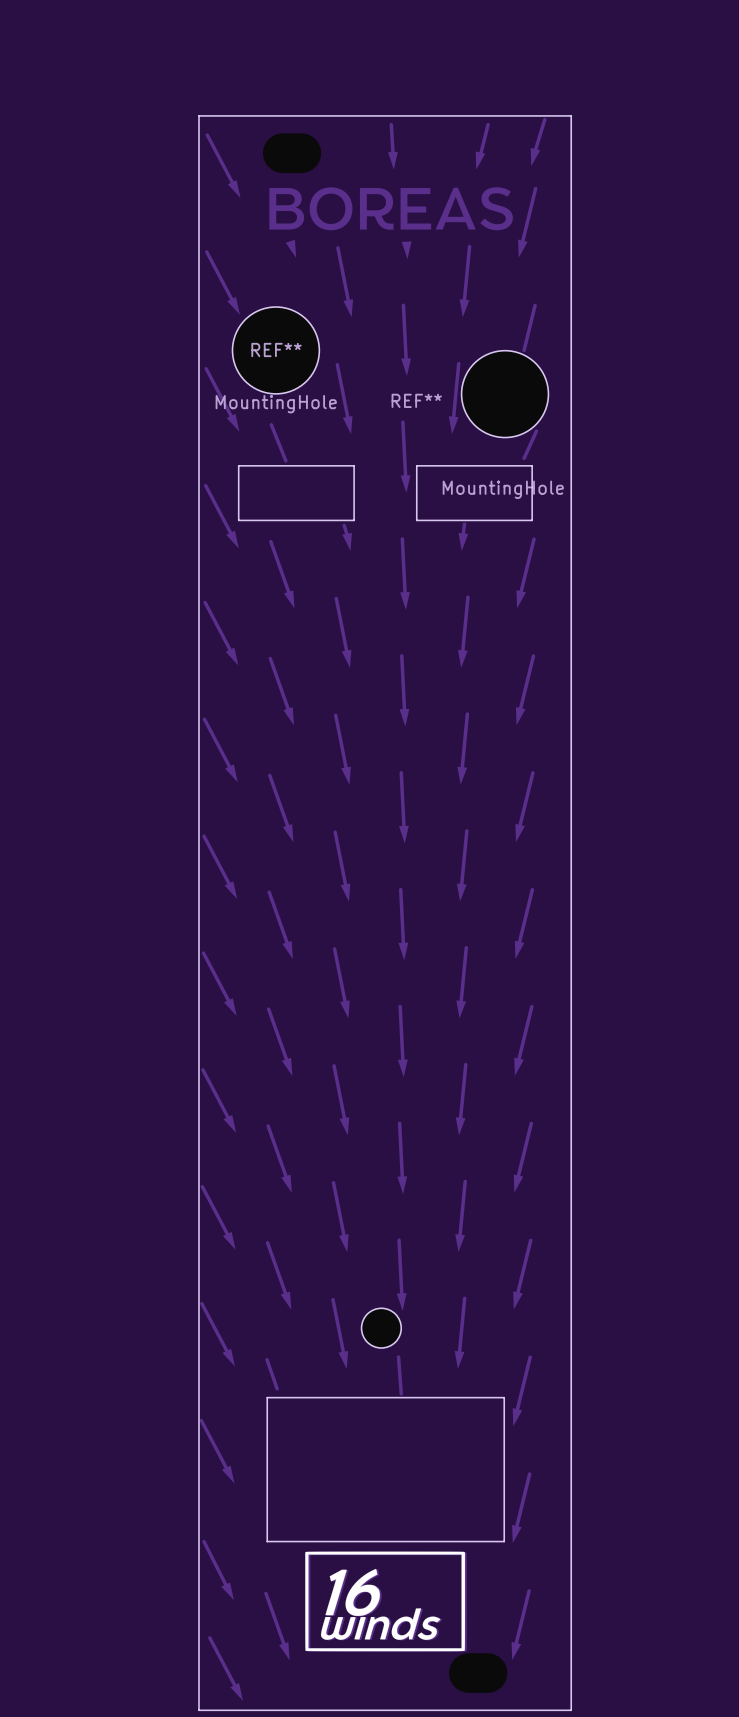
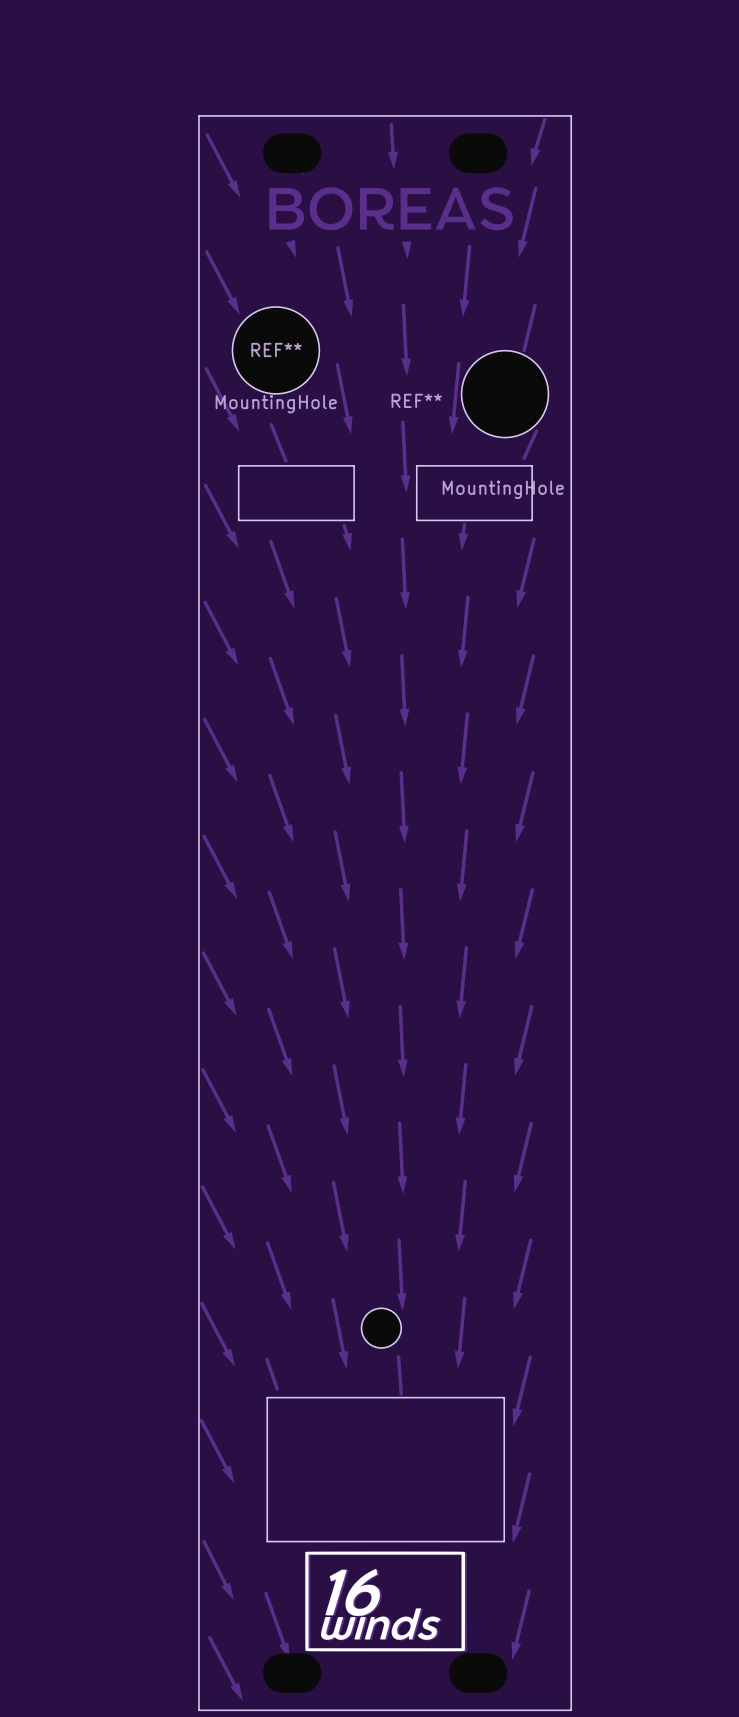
track: (488, 124) (480, 154) -> none
part: none -> (478, 153)
part: none -> (292, 1673)

